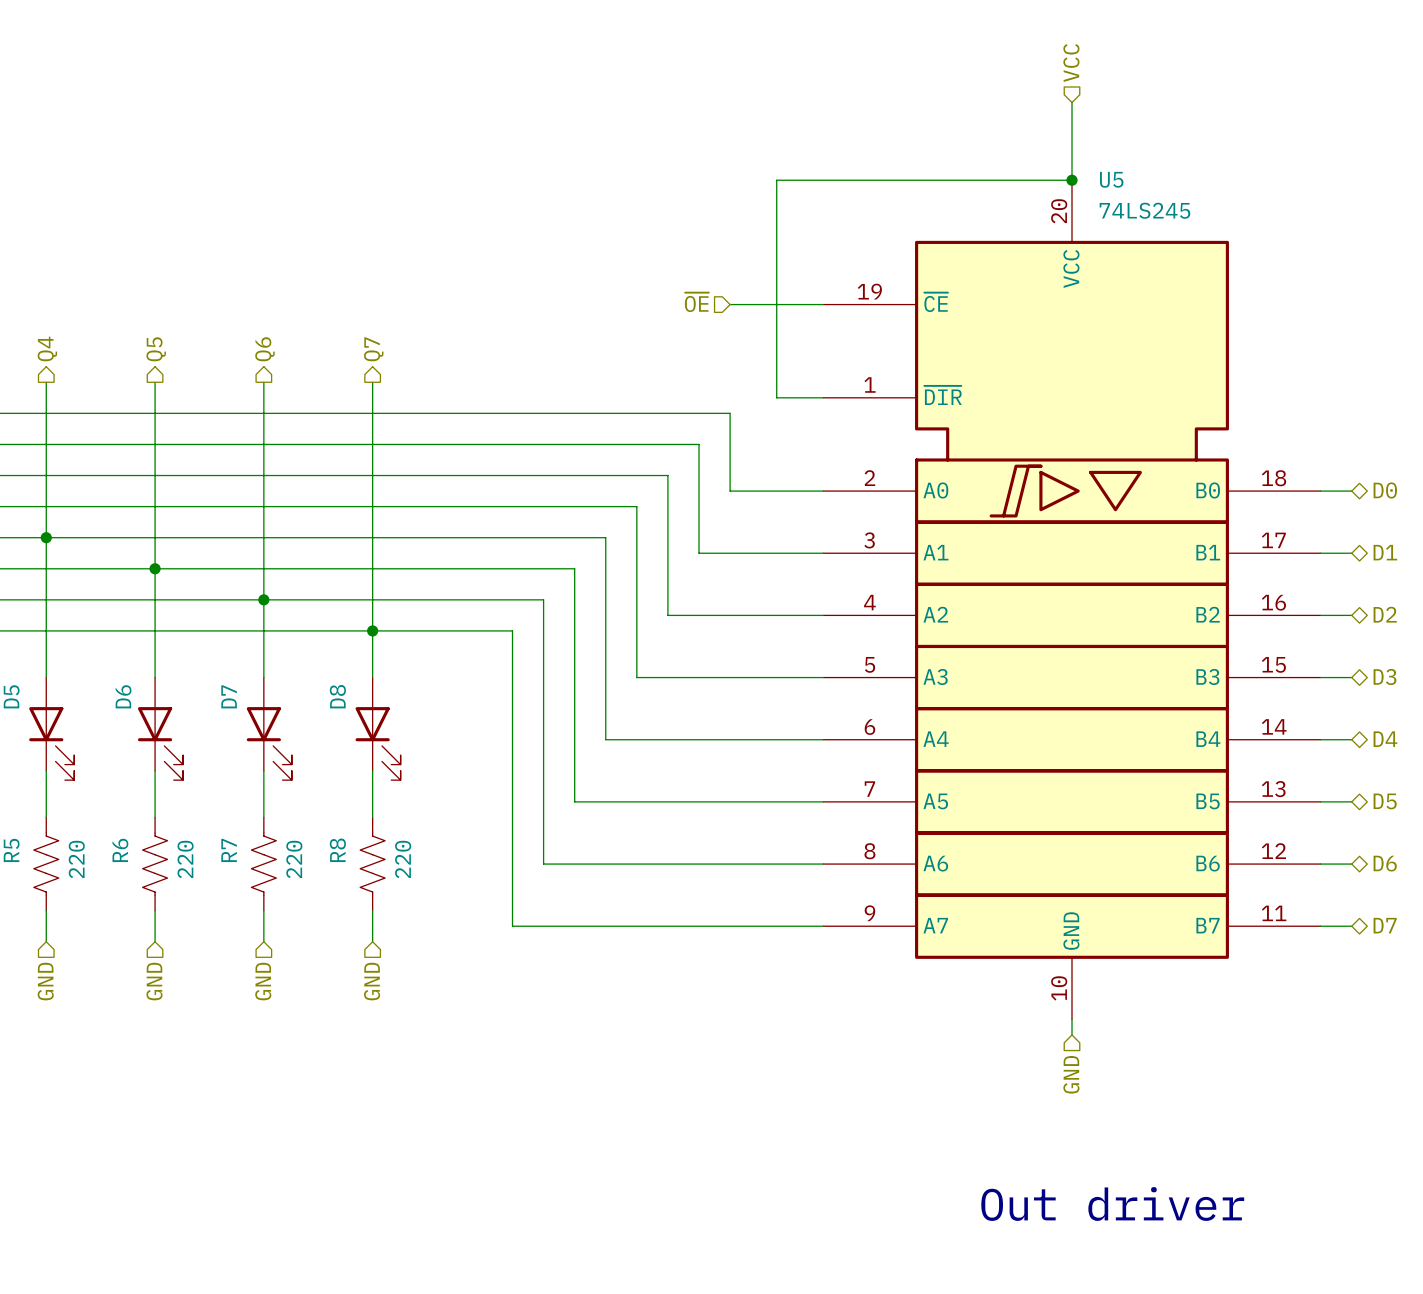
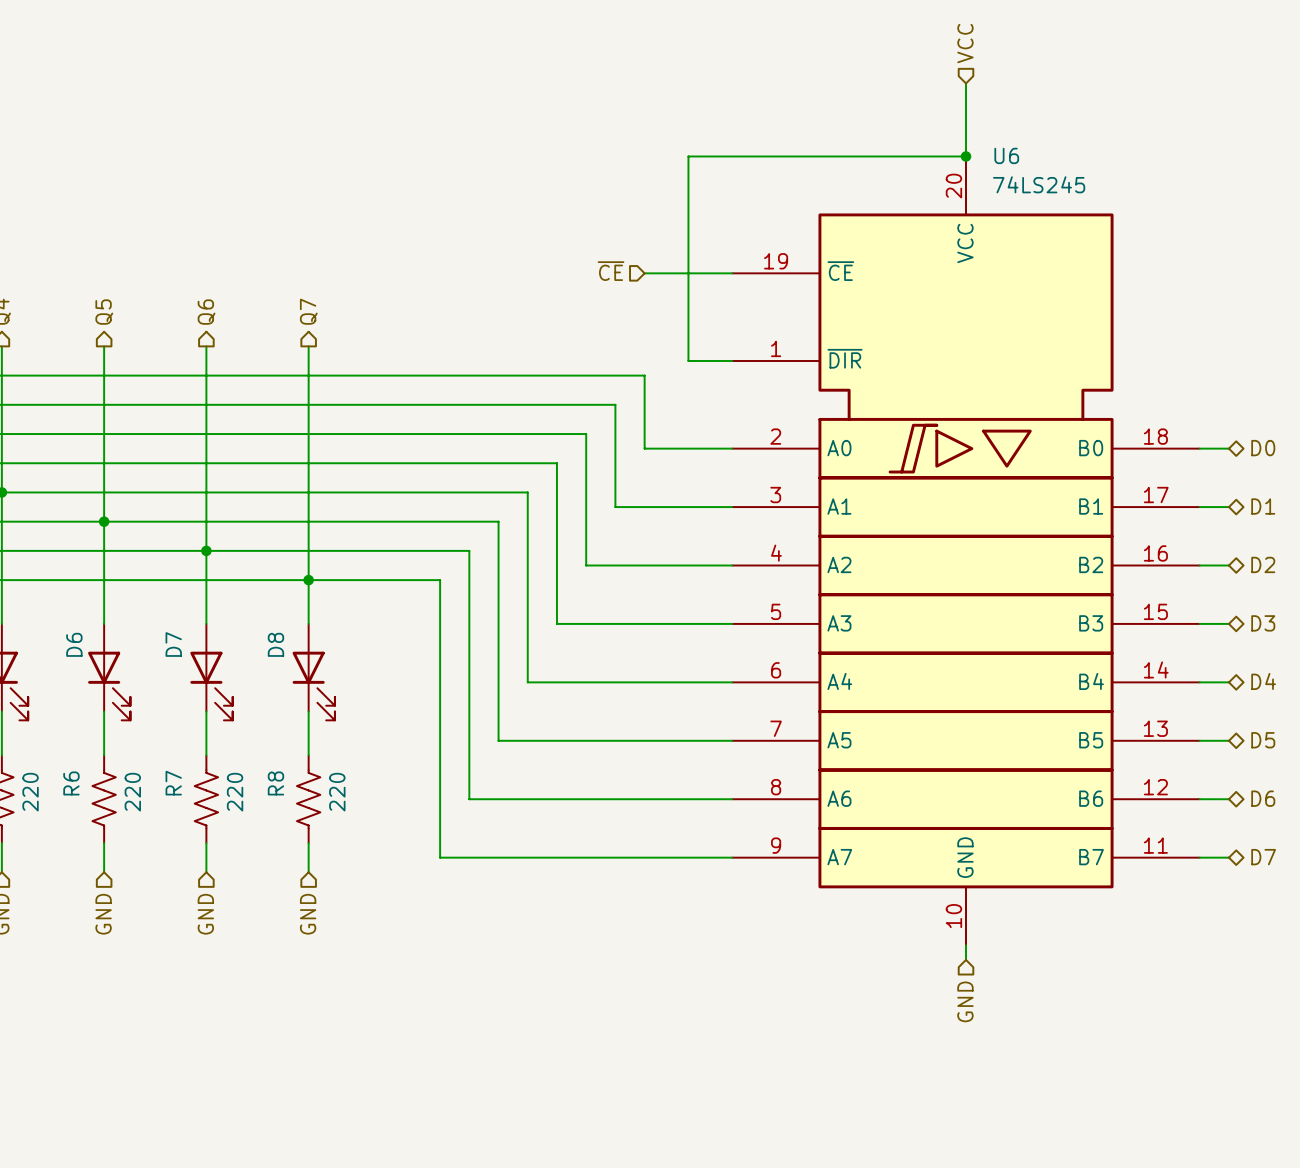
U5 name: U5 (1111, 179) -> U6 (1006, 155)
hierarchical label: ~{OE} (696, 302) -> ~{CE} (611, 271)
text: Out driver (1112, 1204) -> none

